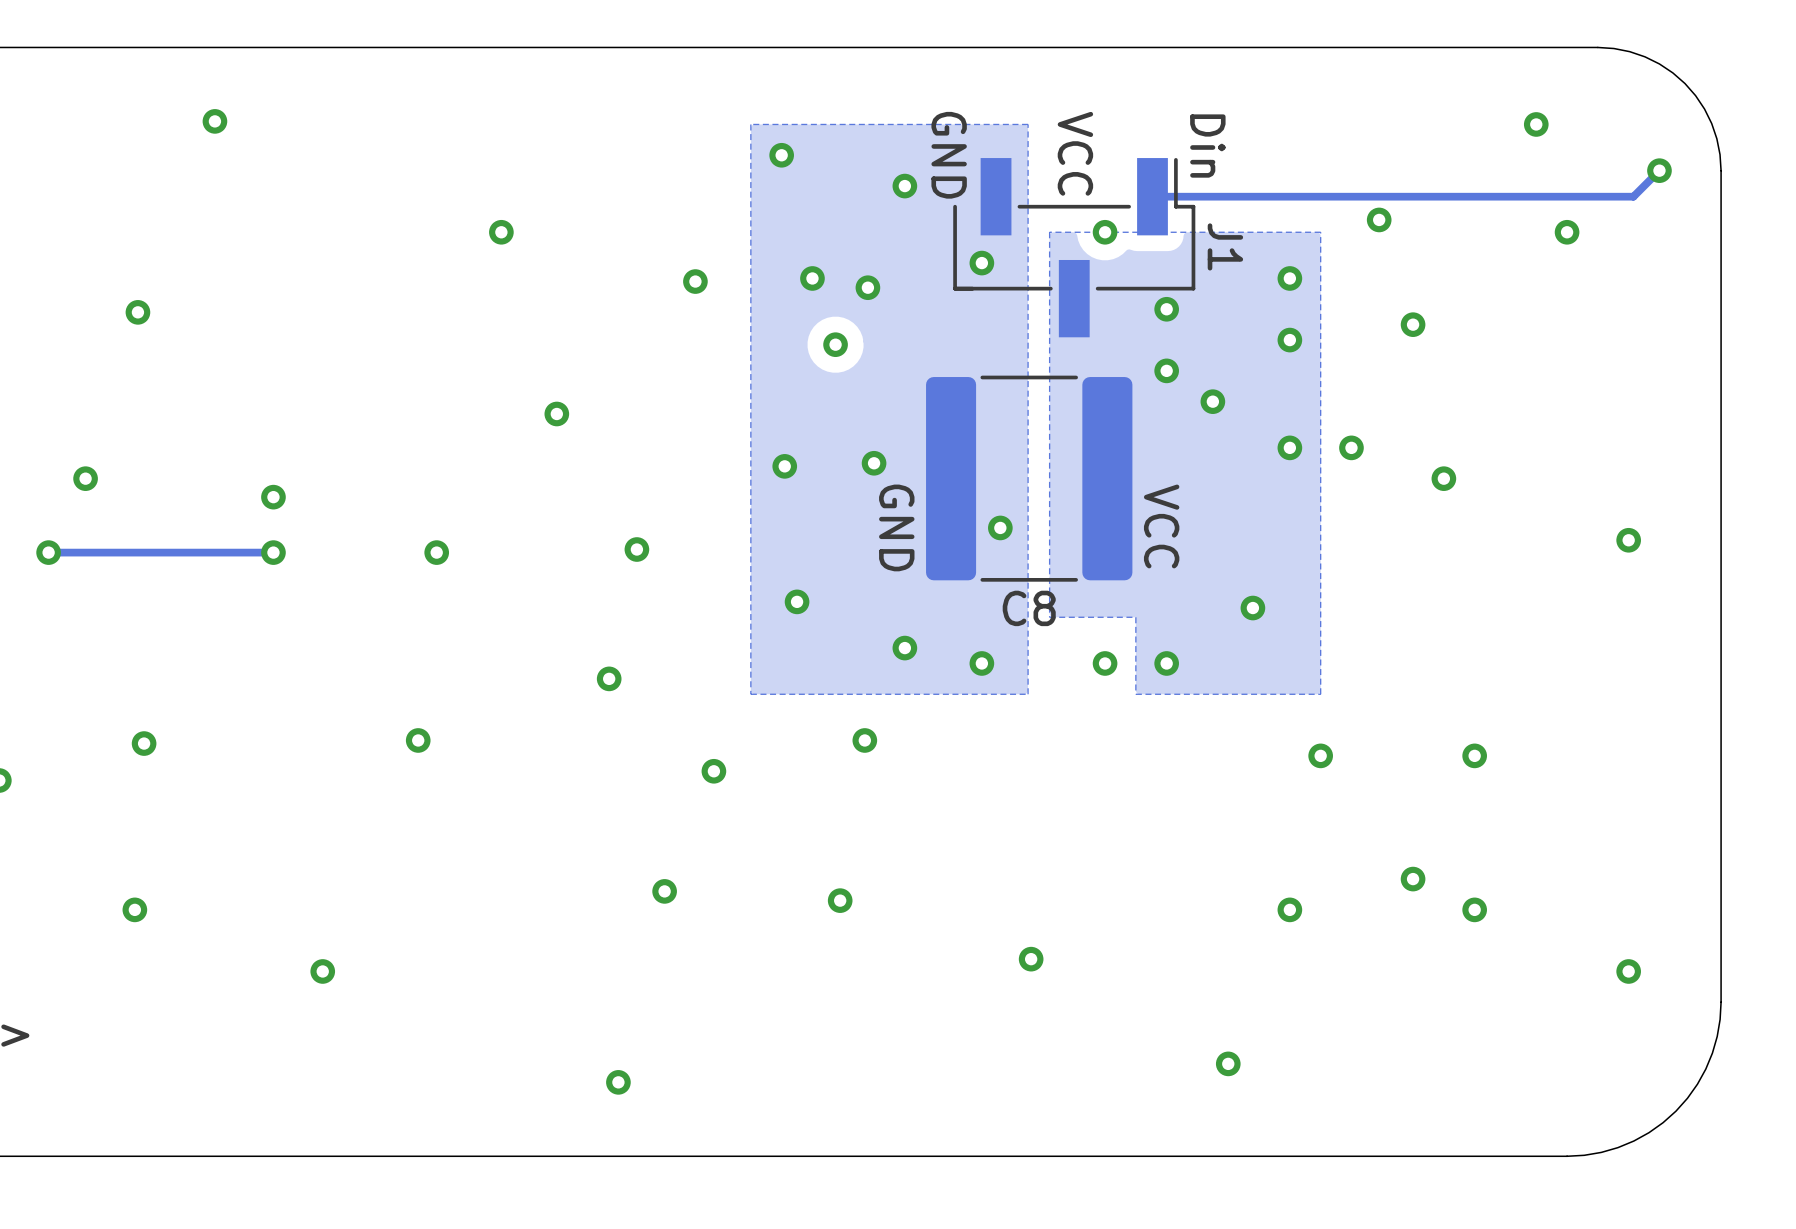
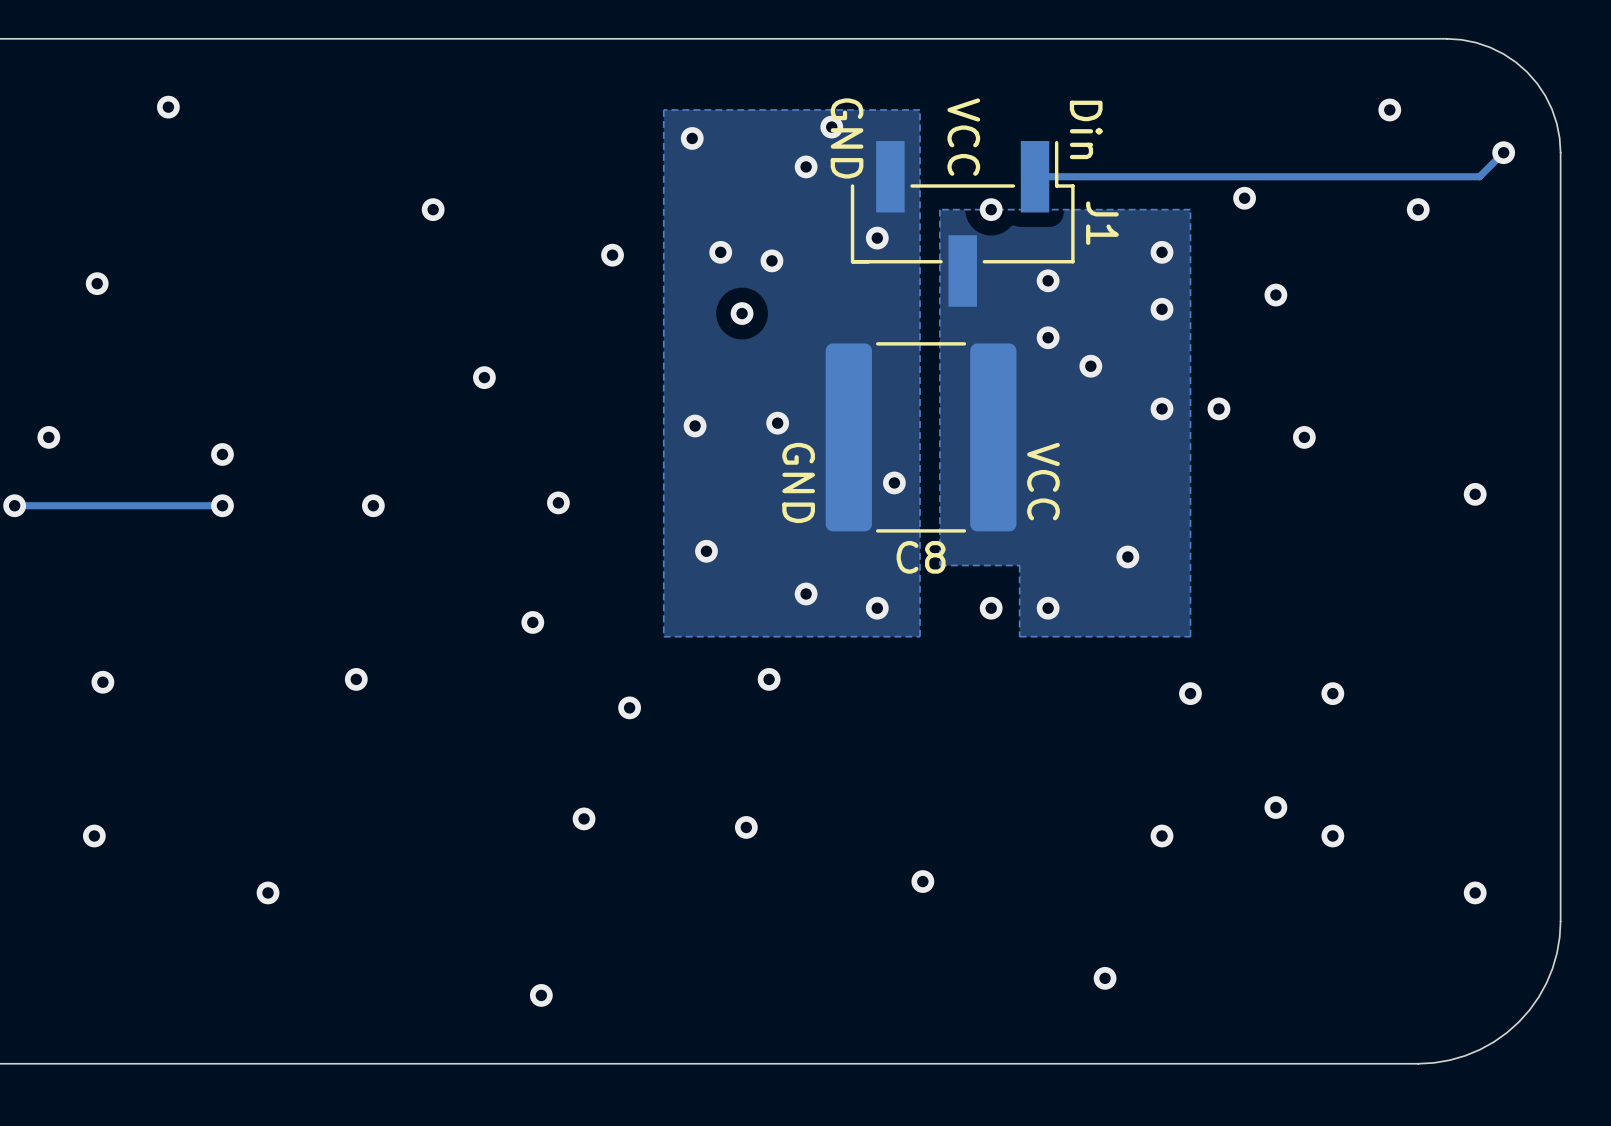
via: none -> (831, 127)

